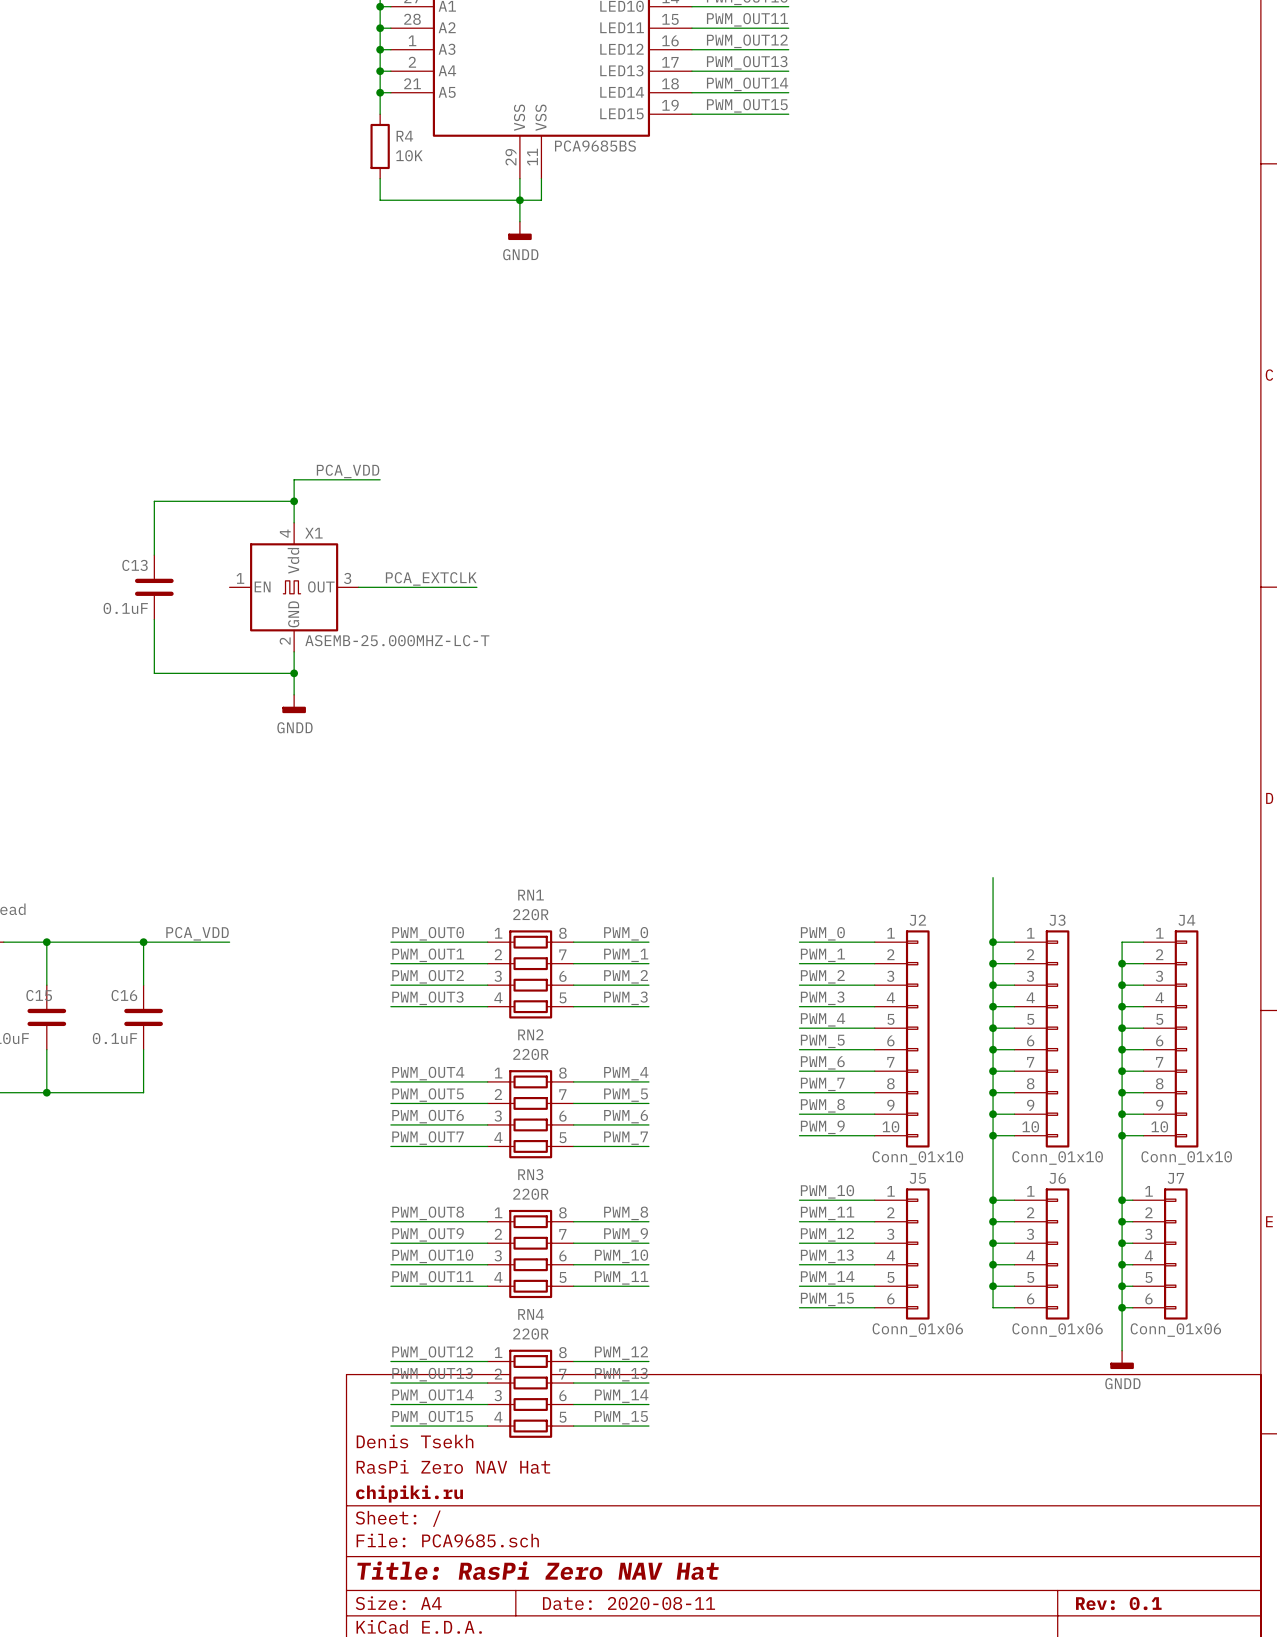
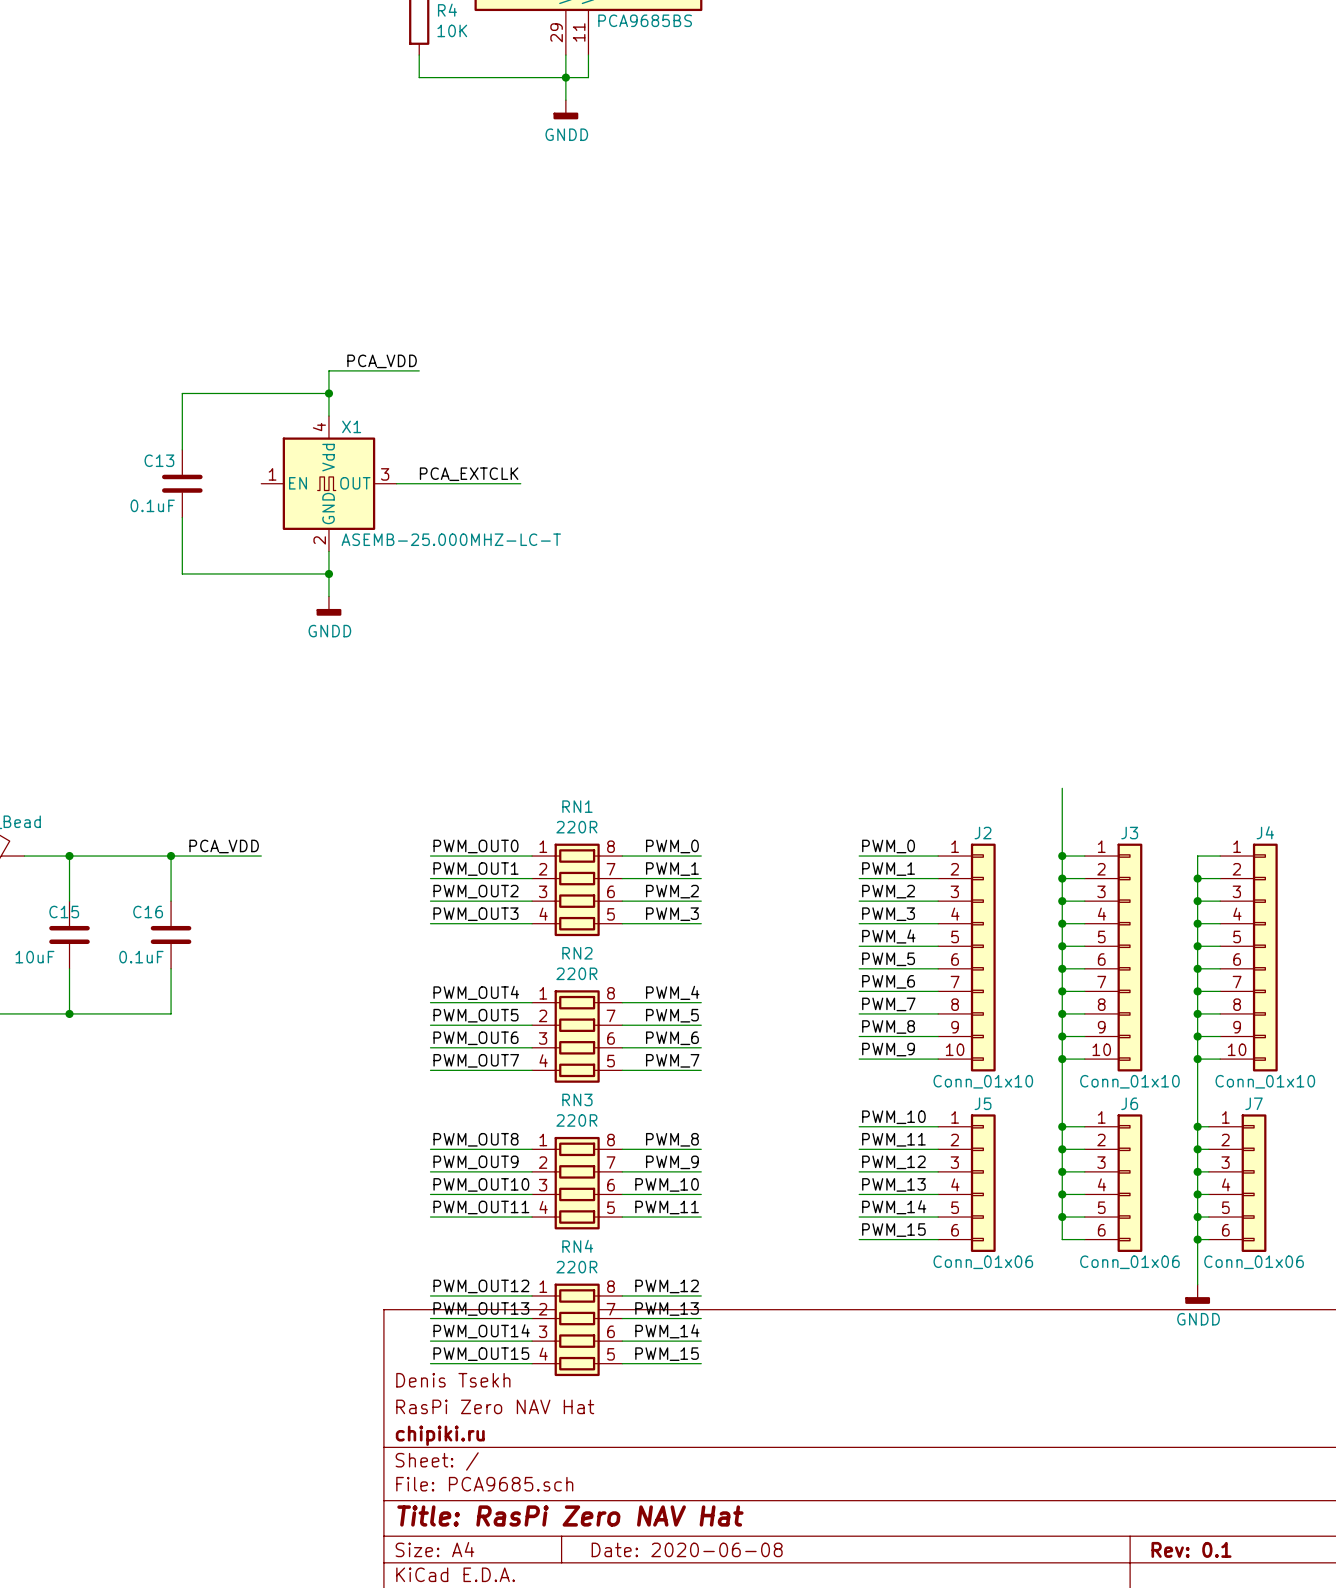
title block: Date: 2020-08-11 (629, 1603) -> Date: 2020-06-08 (687, 1549)

